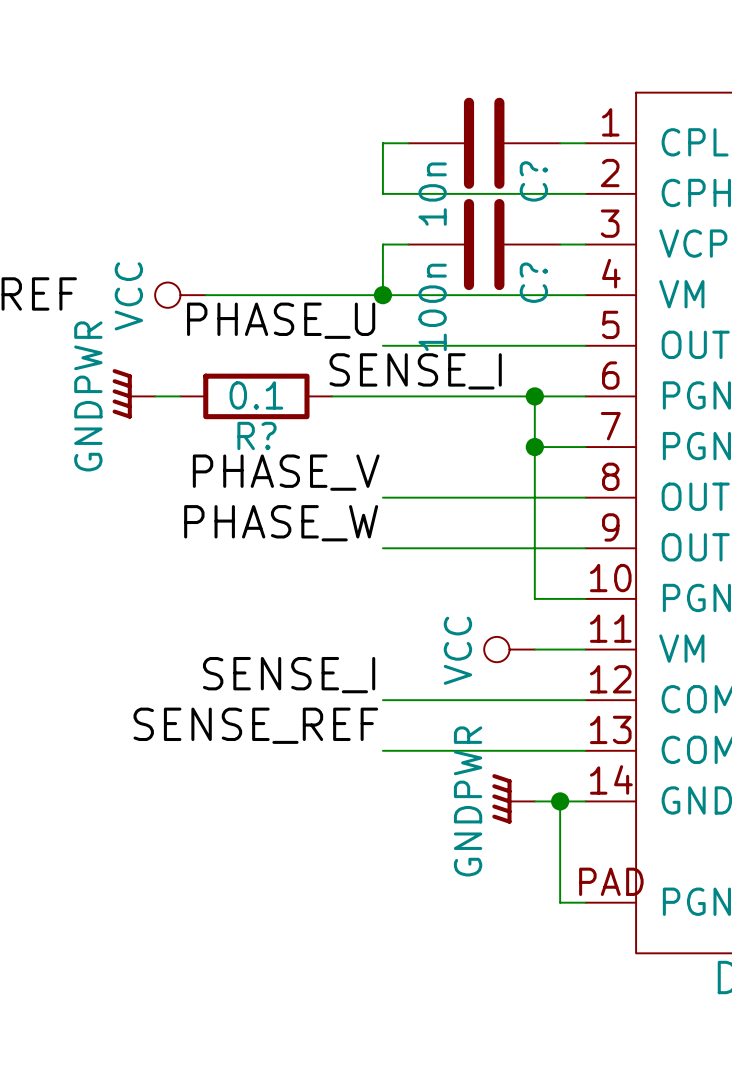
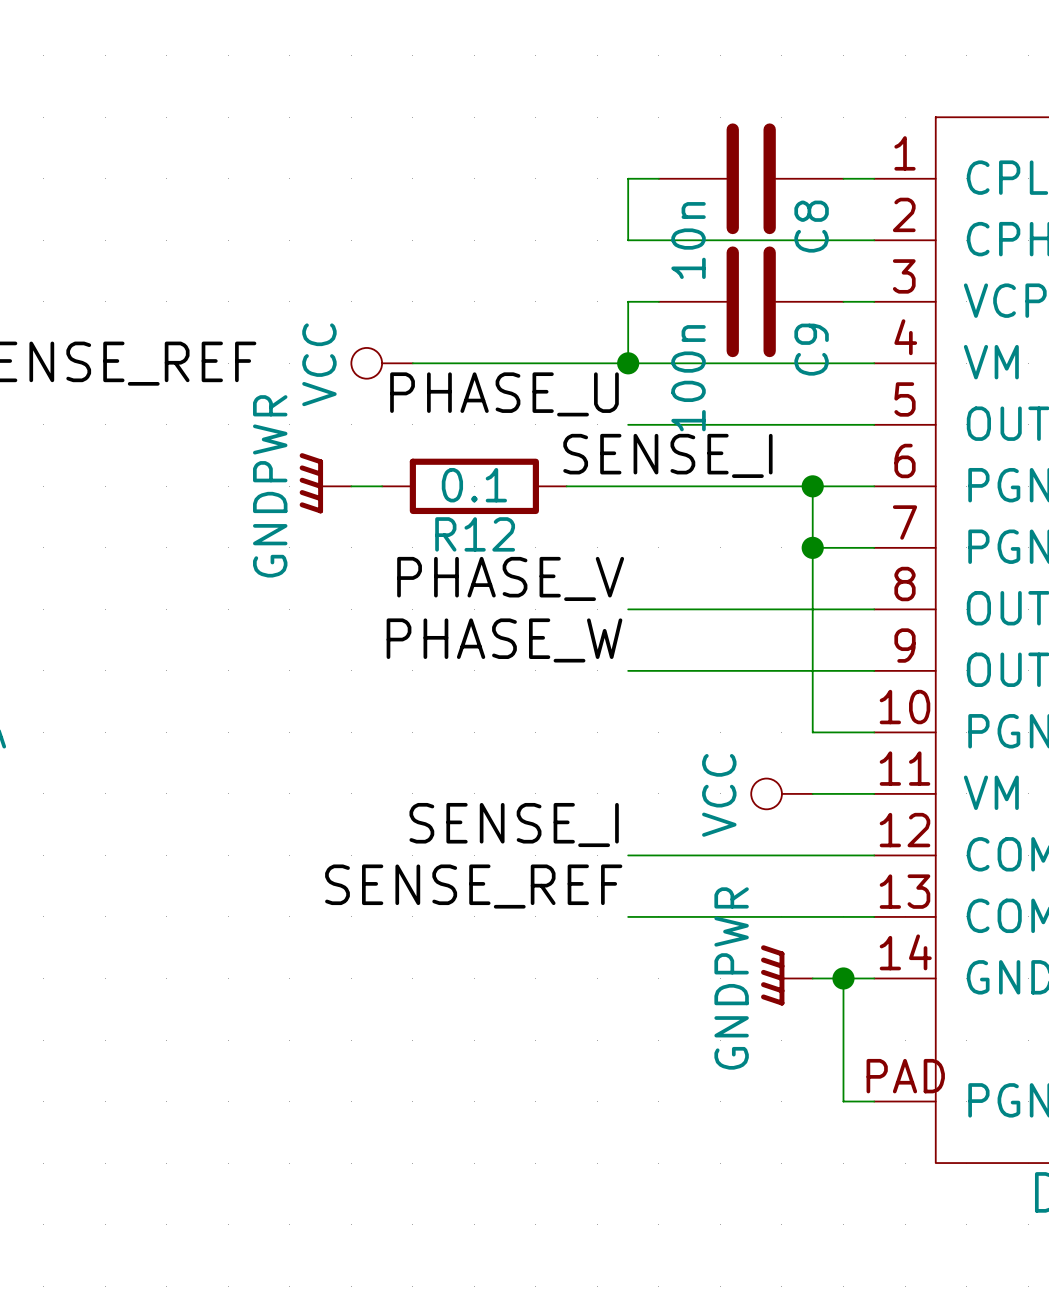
C? name: C? (533, 181) -> C8 (811, 226)
C? name: C? (533, 282) -> C9 (811, 349)
R? name: R? (256, 435) -> R12 (475, 534)

